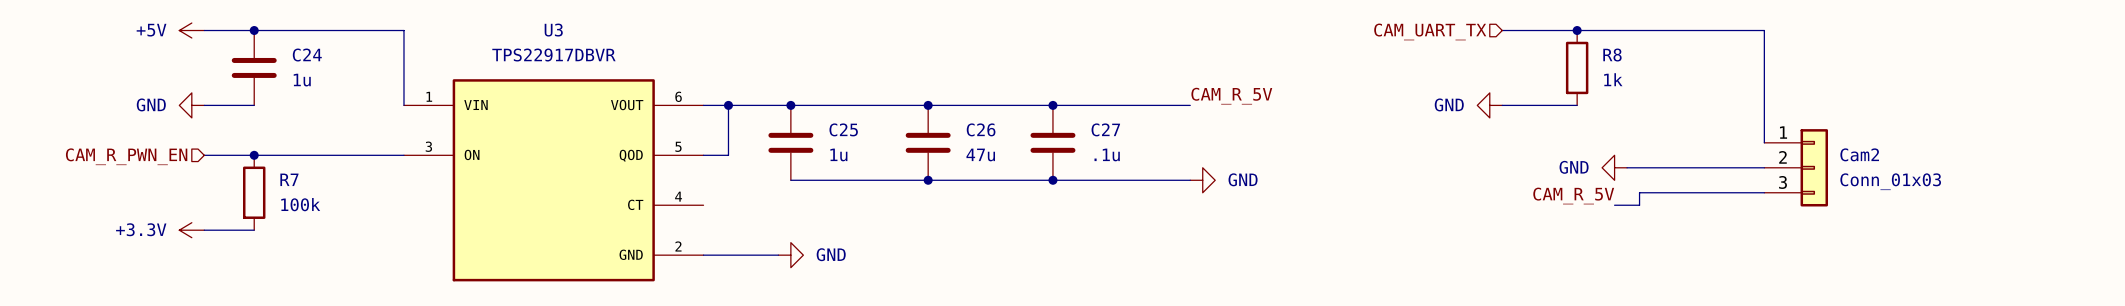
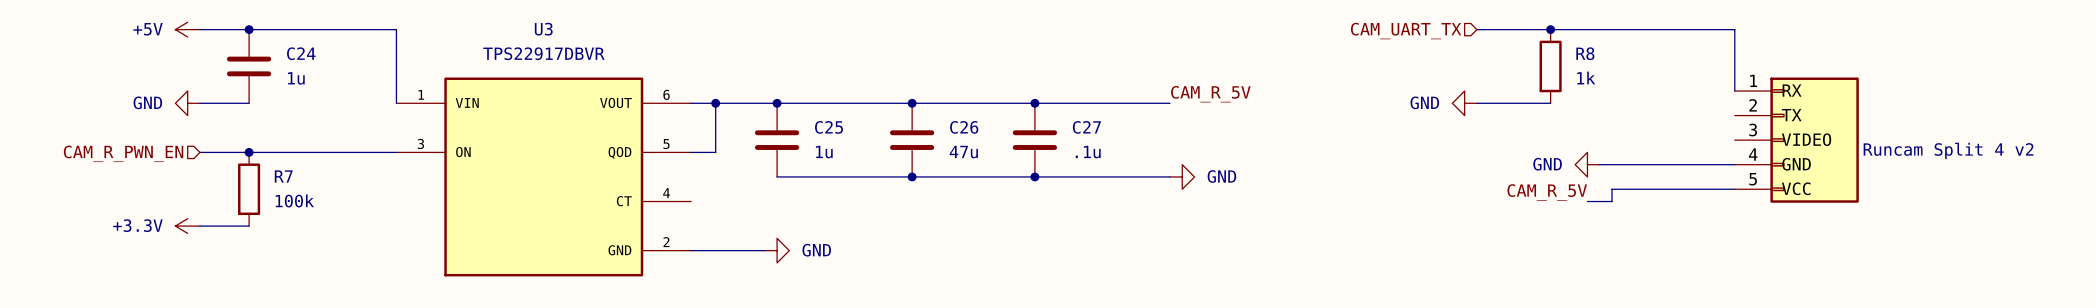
wire: (1764, 92) (1764, 142) -> none
part: none -> Runcam Split 4 v2 (1796, 140)
Cam2: Conn_01x03 (1796, 167) -> none

